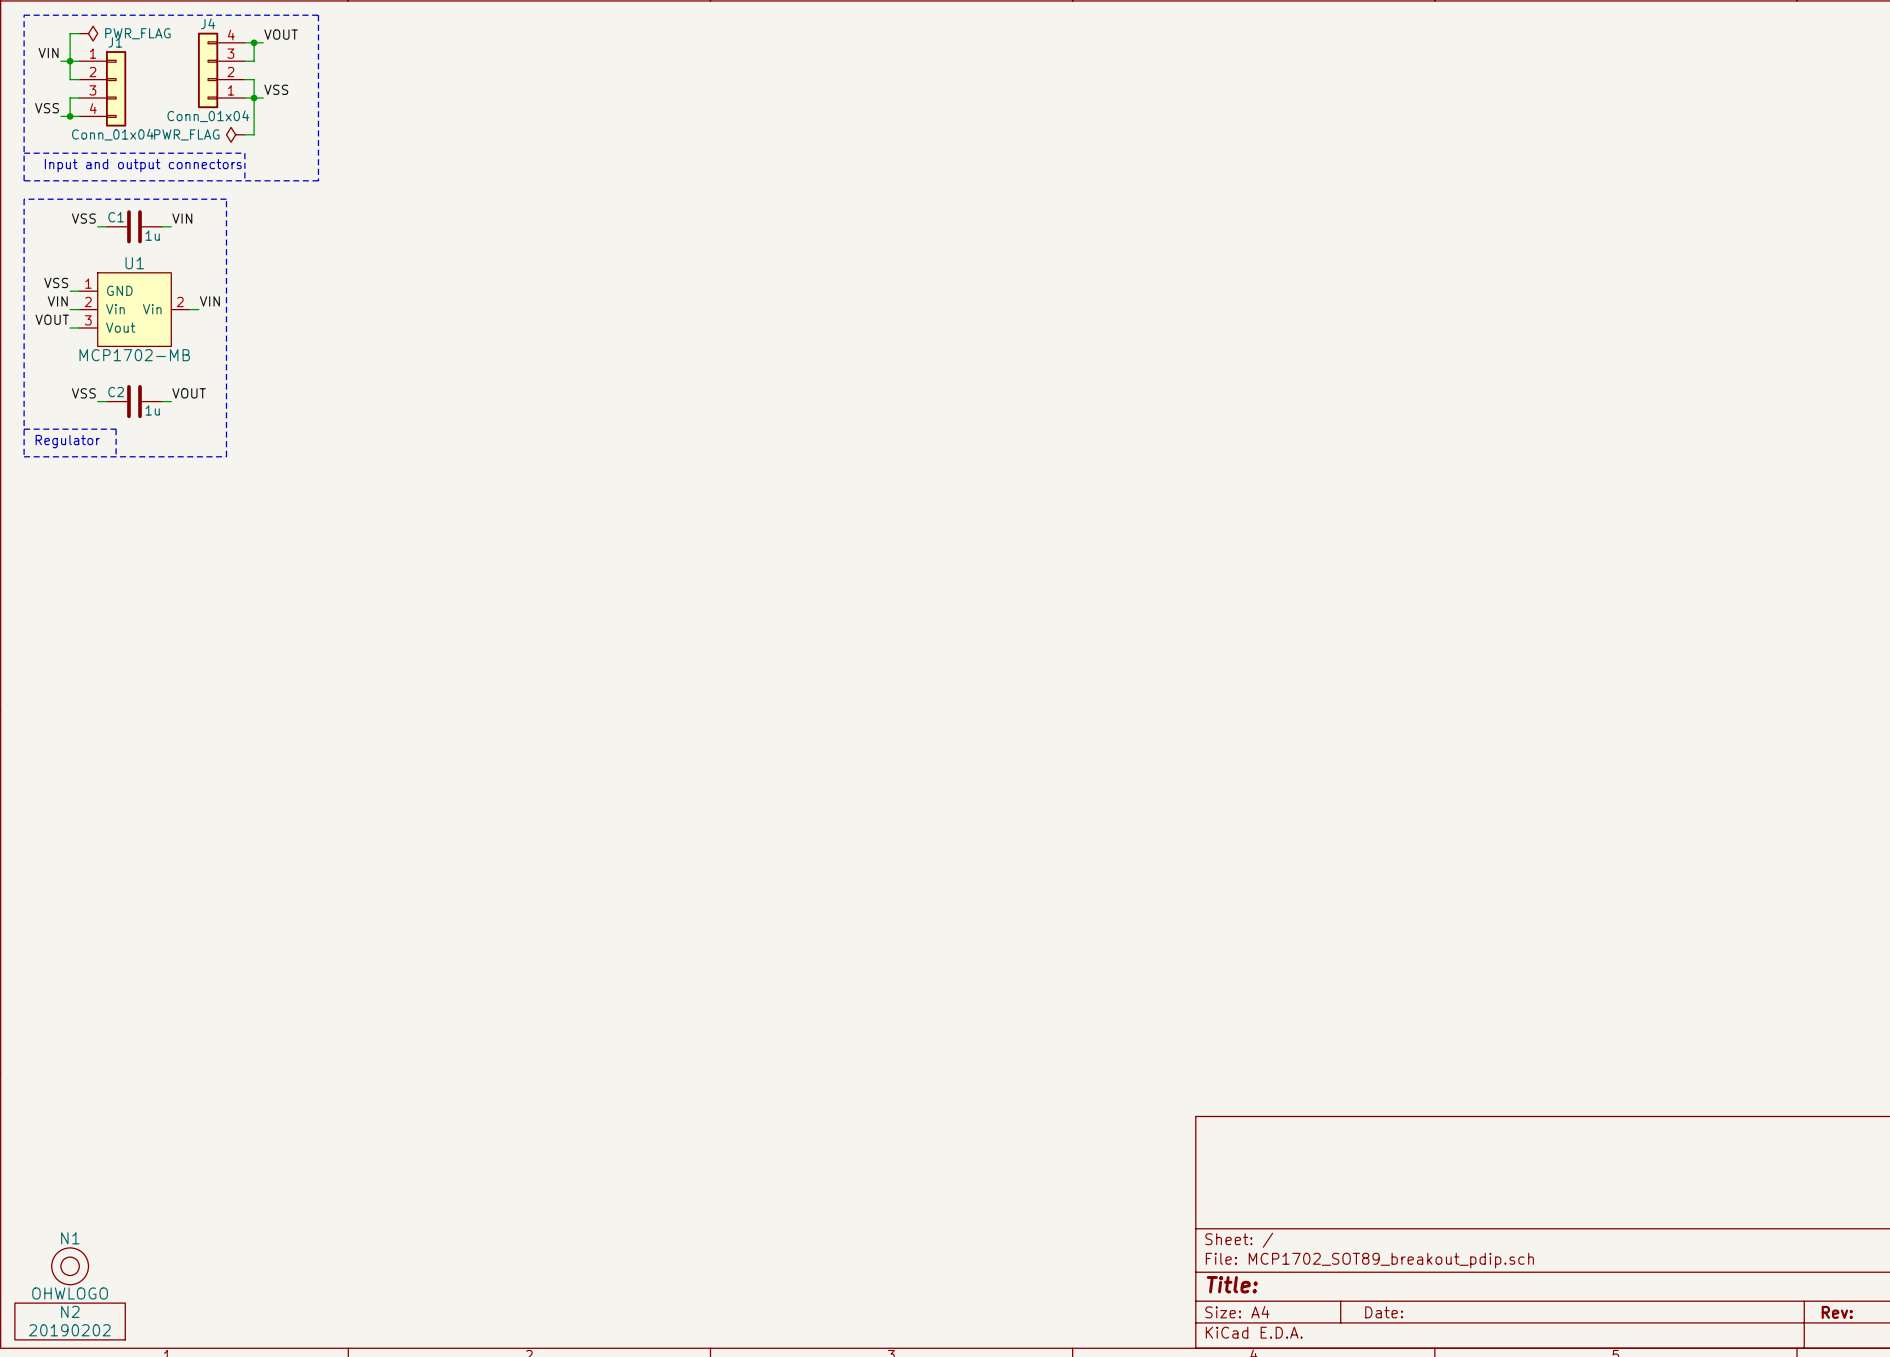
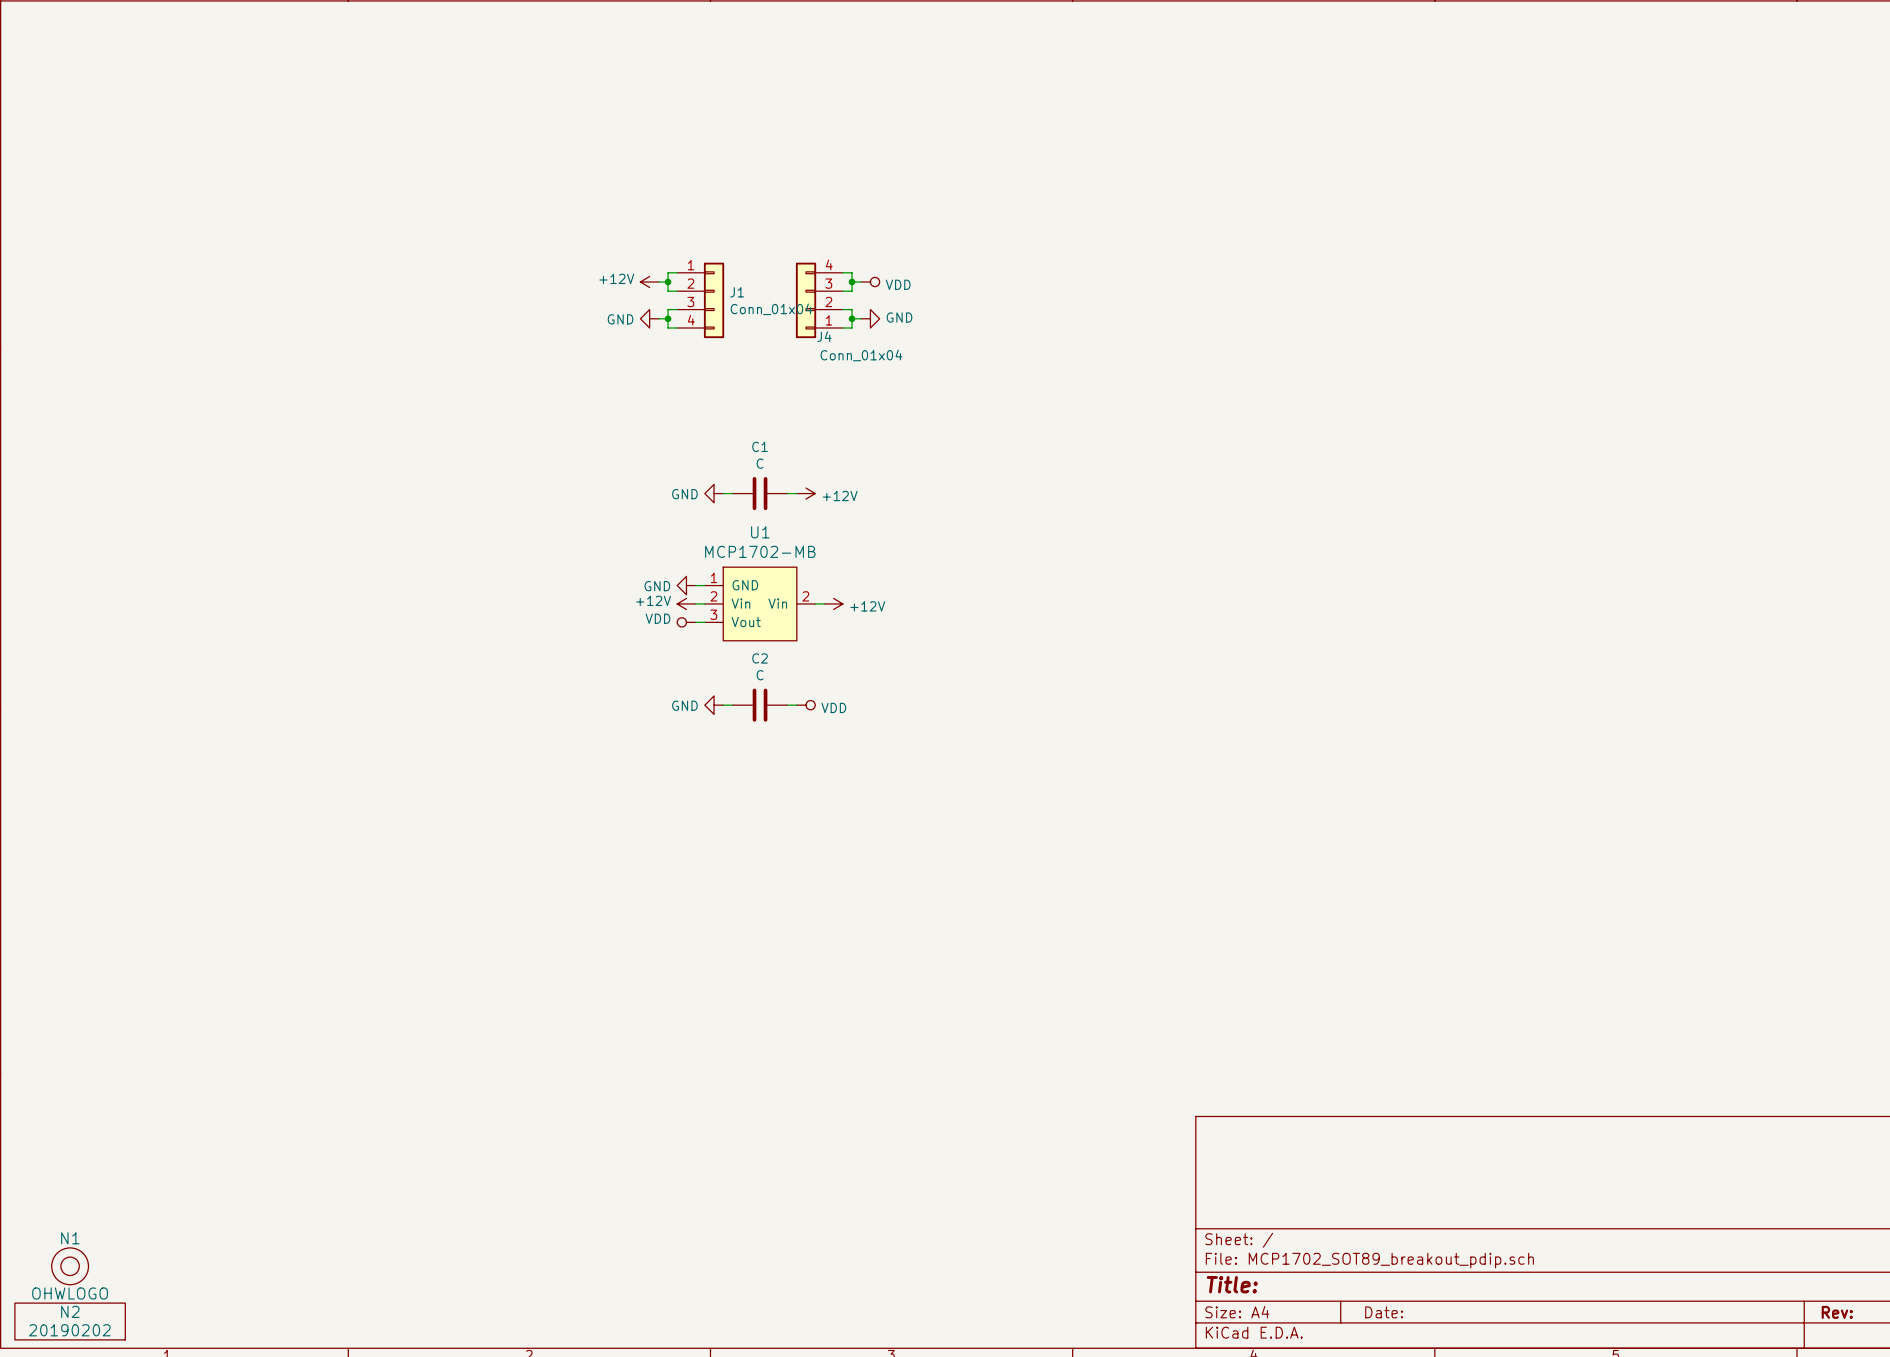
line: (24, 15) (318, 15) (318, 180) (24, 180) (24, 15) -> none
J4 name position: J4 (208, 23) -> J4 (824, 336)
wire: (79, 33) (70, 33) (70, 79) (79, 79) -> none
power symbol: PWR_FLAG (88, 33) -> none
label: VOUT (281, 34) -> none
J1 name position: J1 (115, 42) -> J1 (737, 292)
wire: (244, 42) (263, 42) -> none
wire: (254, 42) (254, 61) (244, 61) -> none
junction: (254, 42) -> none
label: VIN (48, 53) -> none
wire: (60, 61) (79, 61) -> none
junction: (70, 61) -> none
J4 position: (221, 70) -> (819, 300)
wire: (244, 79) (254, 79) (254, 134) (244, 134) -> none
J1 position: (102, 88) -> (700, 300)
label: VSS (276, 89) -> none
wire: (79, 98) (70, 98) (70, 116) -> none
wire: (244, 98) (263, 98) -> none
junction: (254, 98) -> none
label: VSS (47, 108) -> none
wire: (60, 116) (79, 116) -> none
junction: (70, 116) -> none
J4 value position: Conn_01x04 (208, 116) -> Conn_01x04 (861, 355)
J1 value position: Conn_01x04 (112, 134) -> Conn_01x04 (771, 309)
power symbol: PWR_FLAG (235, 134) -> none
line: (24, 153) (244, 153) (244, 180) -> none
text: Input and output connectors (143, 165) -> none
line: (24, 199) (24, 456) (226, 456) (226, 199) (24, 199) -> none
C1 name position: C1 (116, 217) -> C1 (760, 446)
label: VSS (83, 218) -> none
label: VIN (182, 218) -> none
wire: (97, 226) (106, 226) -> none
C1 position: (134, 226) -> (760, 493)
wire: (162, 226) (171, 226) -> none
C1 value: 1u (152, 235) -> C (760, 463)
U1 name position: U1 (134, 263) -> U1 (760, 532)
wire: none -> (677, 272) (668, 272) (668, 291) (677, 291)
wire: none -> (842, 272) (852, 272) (852, 291) (842, 291)
label: VSS (56, 282) -> none
power symbol: none -> +12V (649, 282)
wire: none -> (658, 282) (668, 282)
junction: none -> (668, 282)
wire: none -> (852, 282) (861, 282)
junction: none -> (852, 282)
power symbol: none -> VDD (870, 282)
wire: (70, 291) (79, 291) -> none
label: VIN (57, 301) -> none
label: VIN (209, 301) -> none
wire: (70, 309) (79, 309) -> none
U1 position: (134, 309) -> (760, 603)
wire: (189, 309) (198, 309) -> none
wire: none -> (677, 309) (668, 309) (668, 327) (677, 327)
wire: none -> (842, 309) (852, 309) (852, 327) (842, 327)
power symbol: none -> GND (649, 318)
wire: none -> (658, 318) (668, 318)
junction: none -> (668, 318)
wire: none -> (852, 318) (861, 318)
junction: none -> (852, 318)
power symbol: none -> GND (870, 318)
label: VOUT (52, 319) -> none
wire: (70, 327) (79, 327) -> none
U1 value position: MCP1702-MB (134, 355) -> MCP1702-MB (760, 551)
C2 name position: C2 (116, 392) -> C2 (760, 658)
label: VSS (83, 393) -> none
label: VOUT (189, 393) -> none
wire: (97, 401) (106, 401) -> none
C2 position: (134, 401) -> (760, 705)
wire: (162, 401) (171, 401) -> none
C2 value: 1u (152, 410) -> C (760, 675)
line: (24, 429) (116, 429) (116, 456) -> none
text: Regulator (67, 441) -> none
power symbol: none -> GND (714, 493)
wire: none -> (723, 493) (732, 493)
wire: none -> (787, 493) (796, 493)
power symbol: none -> +12V (806, 493)
power symbol: none -> GND (686, 585)
wire: none -> (695, 585) (704, 585)
power symbol: none -> +12V (686, 603)
wire: none -> (695, 603) (704, 603)
wire: none -> (815, 603) (824, 603)
power symbol: none -> +12V (833, 603)
power symbol: none -> VDD (686, 622)
wire: none -> (695, 622) (704, 622)
power symbol: none -> GND (714, 705)
wire: none -> (723, 705) (732, 705)
wire: none -> (787, 705) (796, 705)
power symbol: none -> VDD (806, 705)

